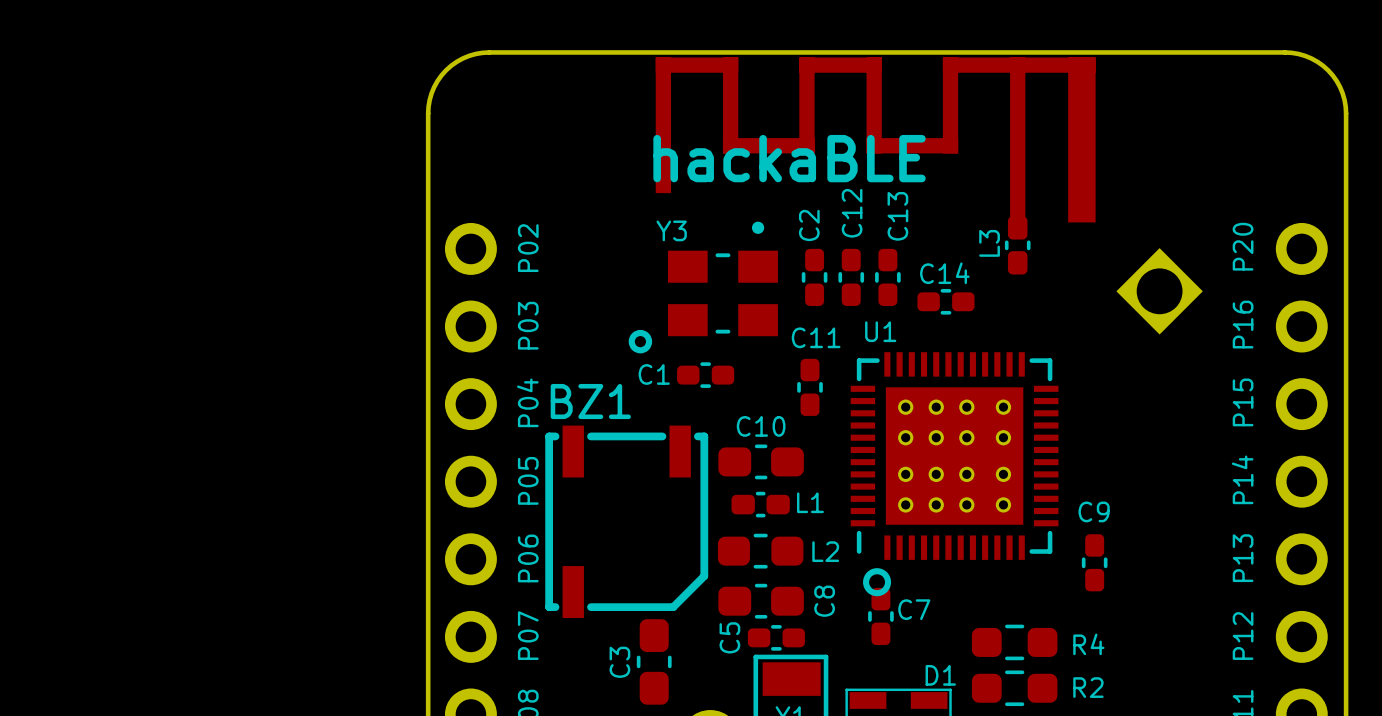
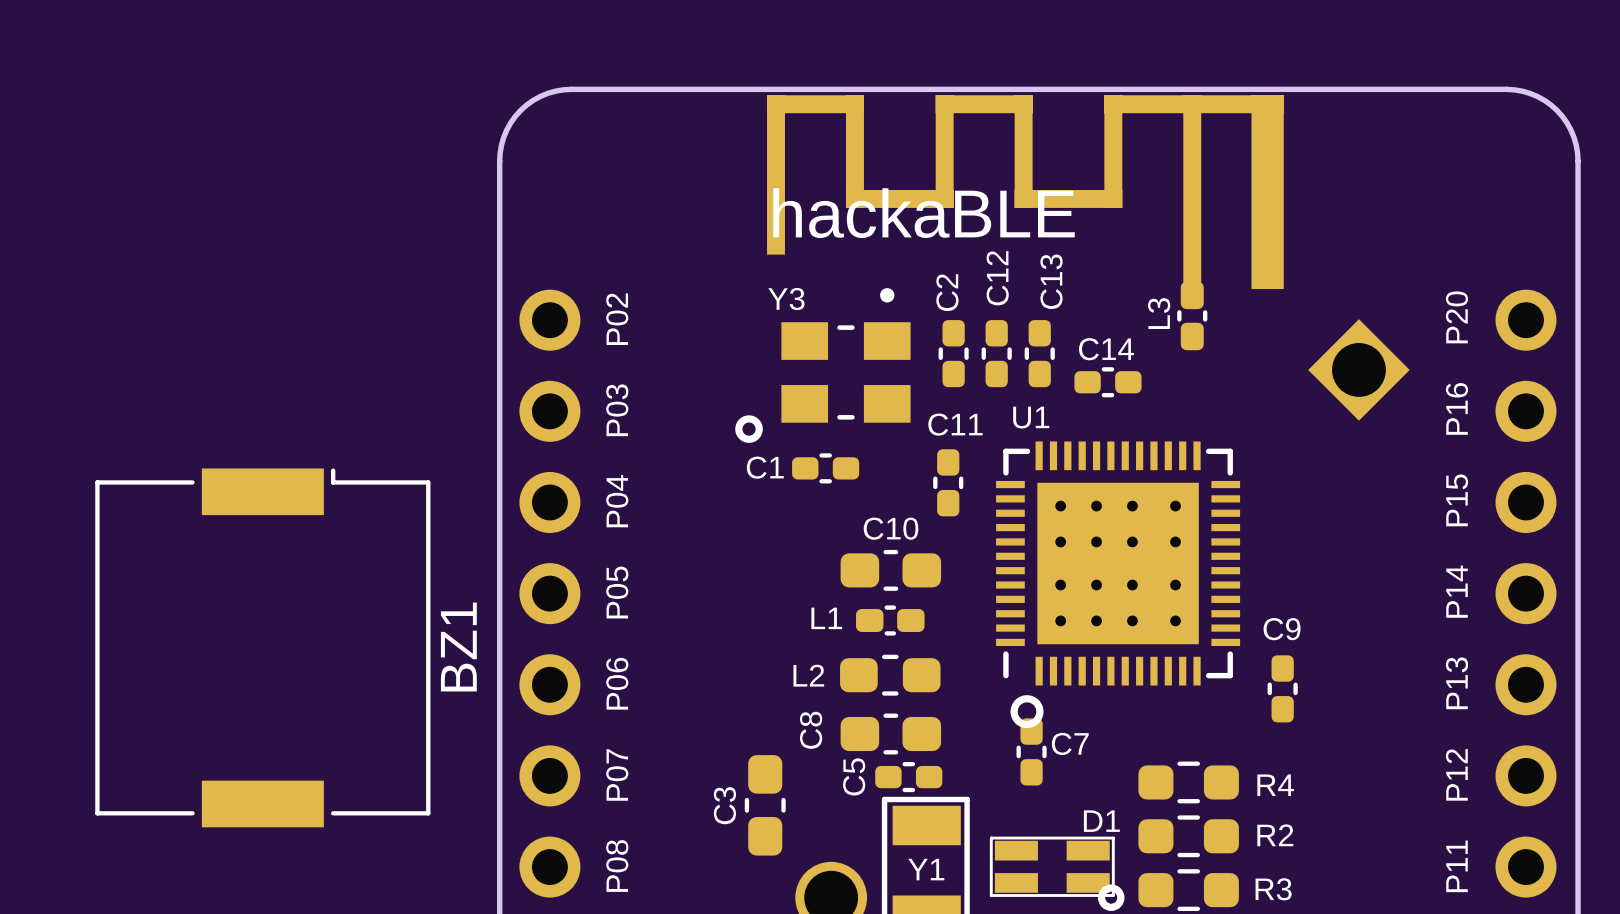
BZ1 name position: BZ1 (590, 401) -> BZ1 (458, 647)
BZ1 footprint: [545, 425, 709, 619] -> [95, 468, 431, 828]
L1 name position: L1 (810, 502) -> L1 (826, 618)
L2 name position: L2 (825, 551) -> L2 (808, 675)
C8 name position: C8 (824, 601) -> C8 (811, 730)

